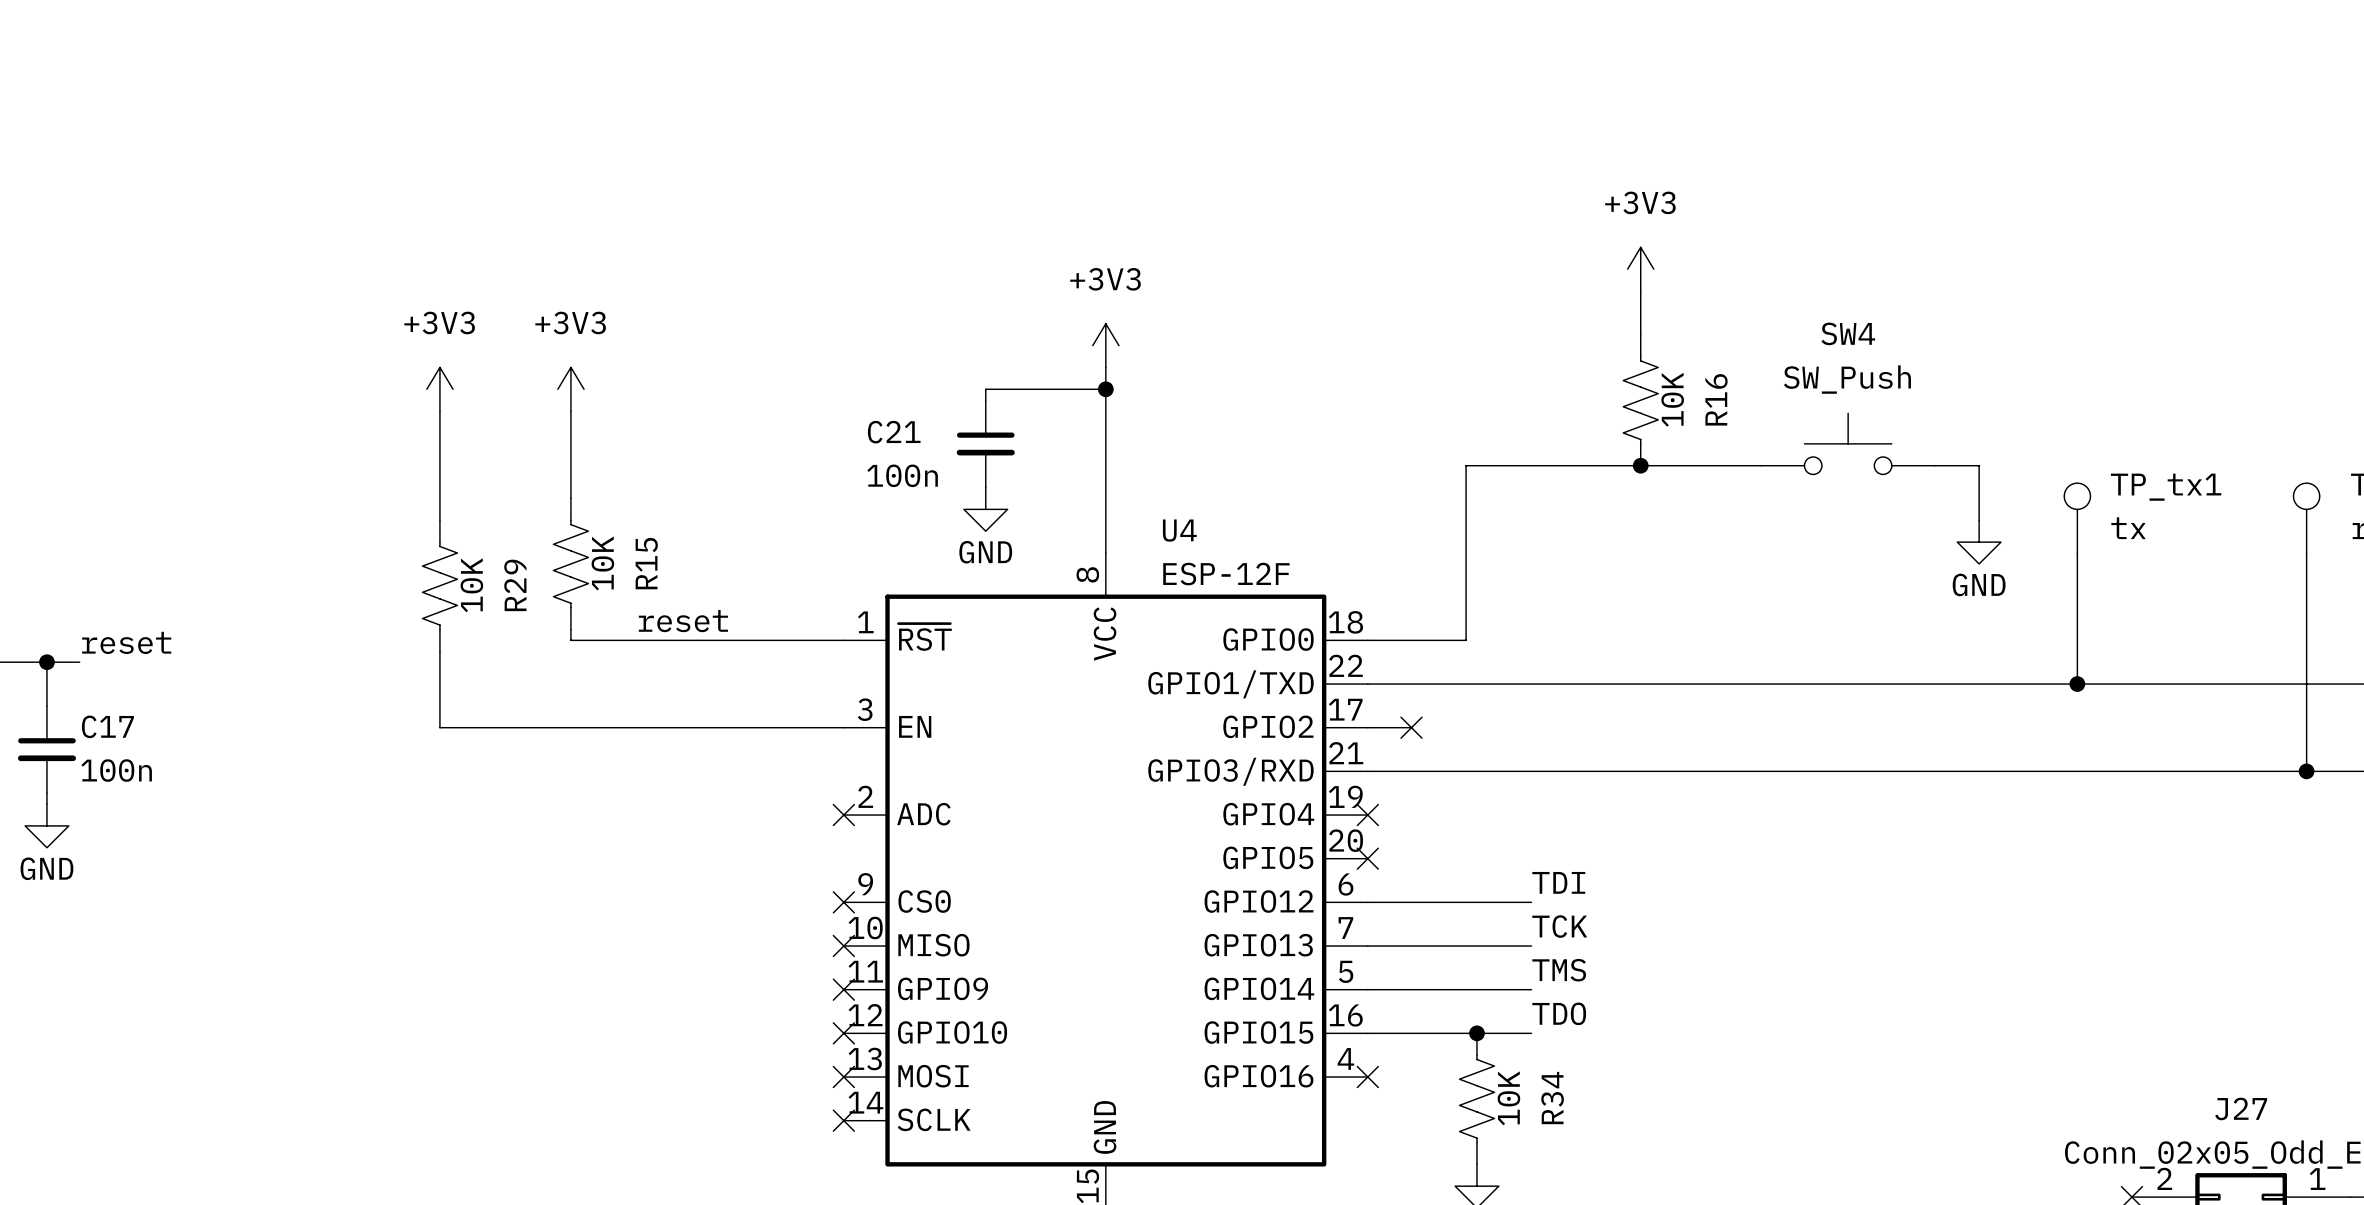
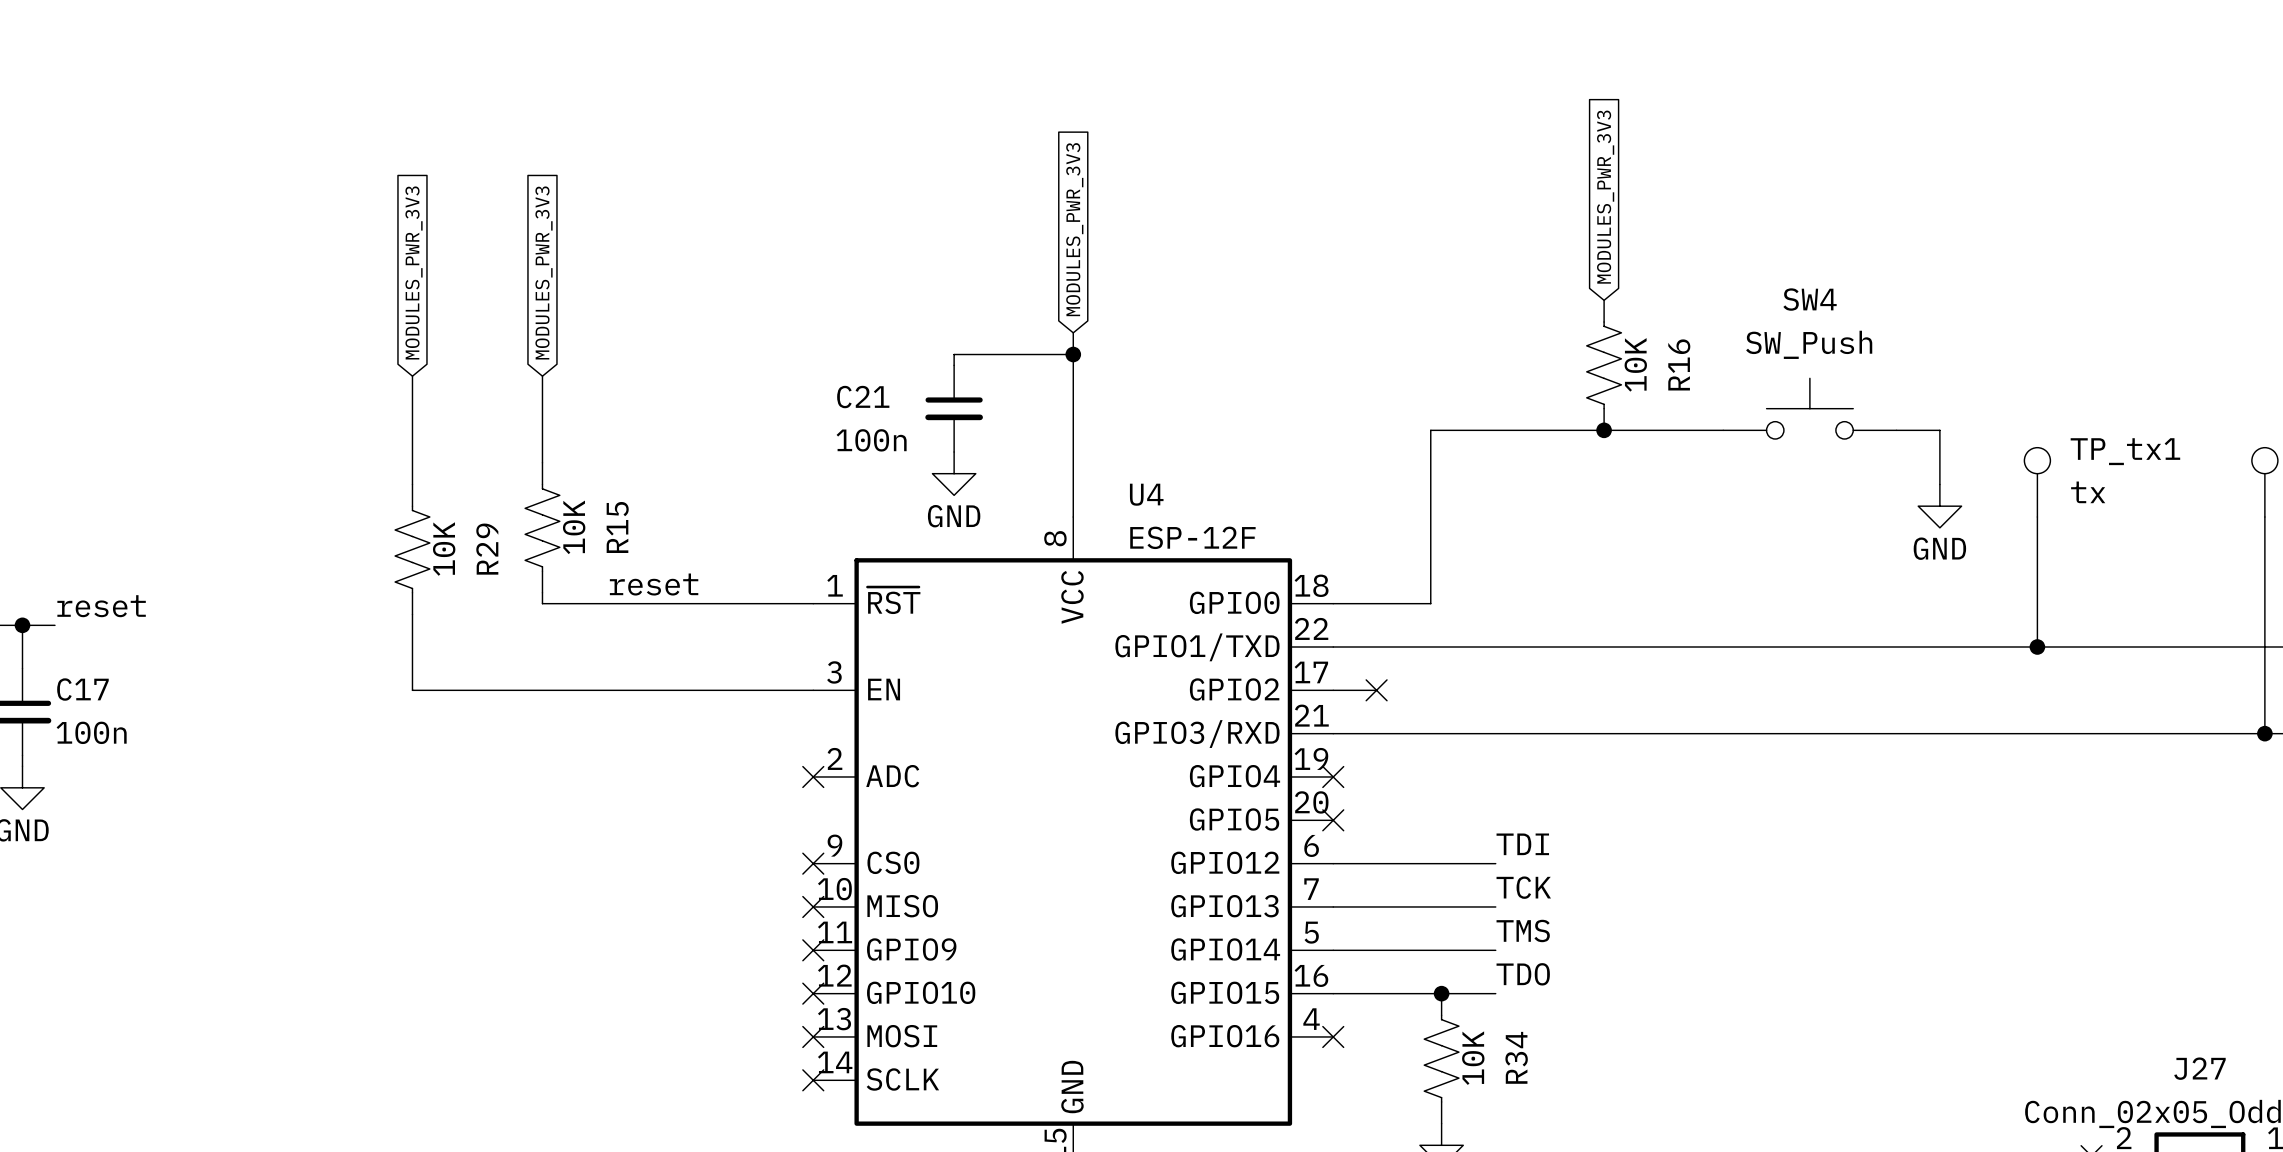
global label: none -> MODULES_PWR_3V3 (1605, 197)
global label: none -> MODULES_PWR_3V3 (1074, 229)
power symbol: +3V3 (1640, 269) -> none
wire: (1640, 291) (1640, 334) -> none
global label: none -> MODULES_PWR_3V3 (414, 272)
global label: none -> MODULES_PWR_3V3 (544, 272)
power symbol: +3V3 (1105, 345) -> none
power symbol: +3V3 (439, 389) -> none
power symbol: +3V3 (570, 389) -> none

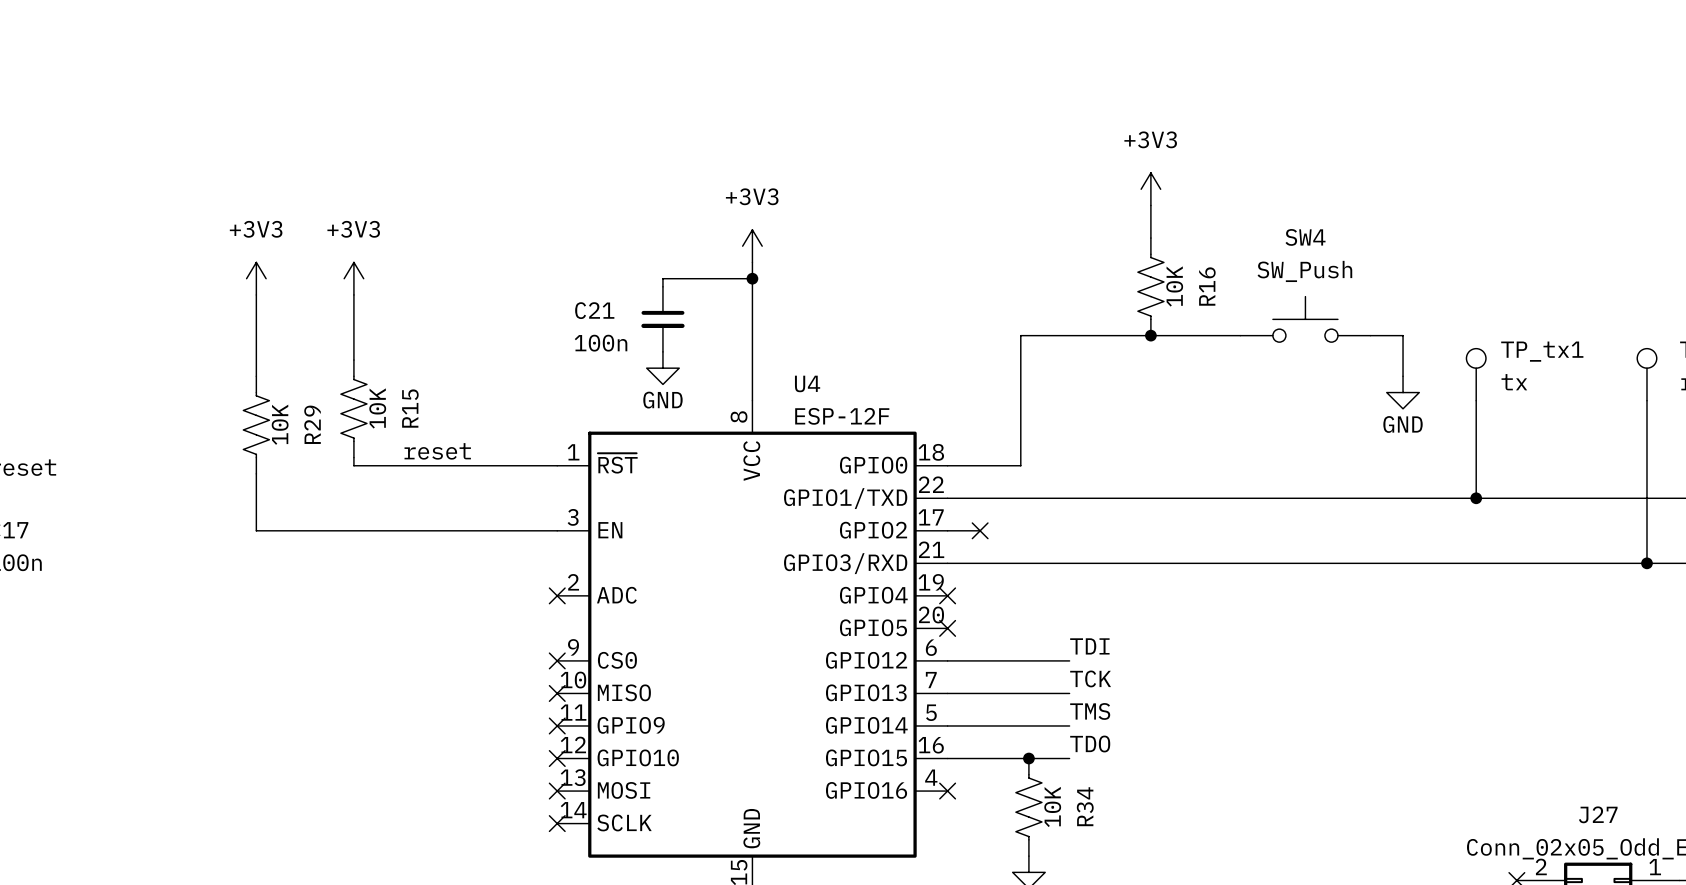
global label: MODULES_PWR_3V3 (1605, 197) -> none
global label: MODULES_PWR_3V3 (1074, 229) -> none
power symbol: none -> +3V3 (1150, 189)
wire: none -> (1150, 205) (1150, 238)
global label: MODULES_PWR_3V3 (414, 272) -> none
global label: MODULES_PWR_3V3 (544, 272) -> none
power symbol: none -> +3V3 (752, 246)
power symbol: none -> +3V3 (256, 278)
power symbol: none -> +3V3 (353, 278)

